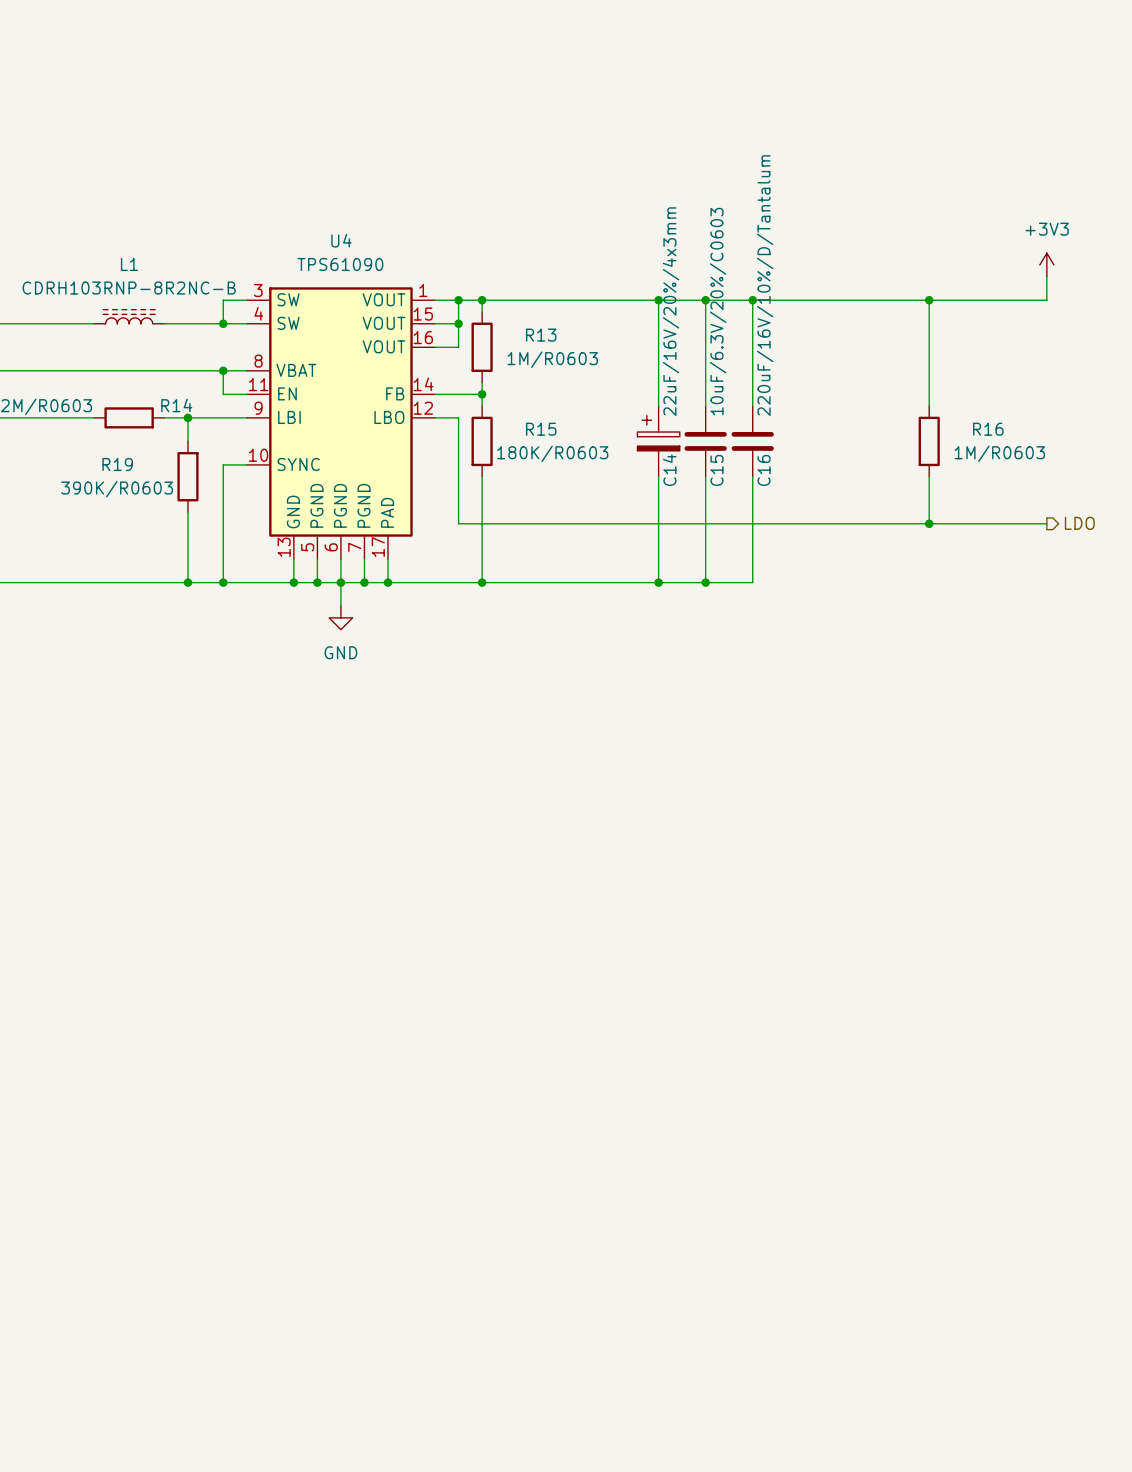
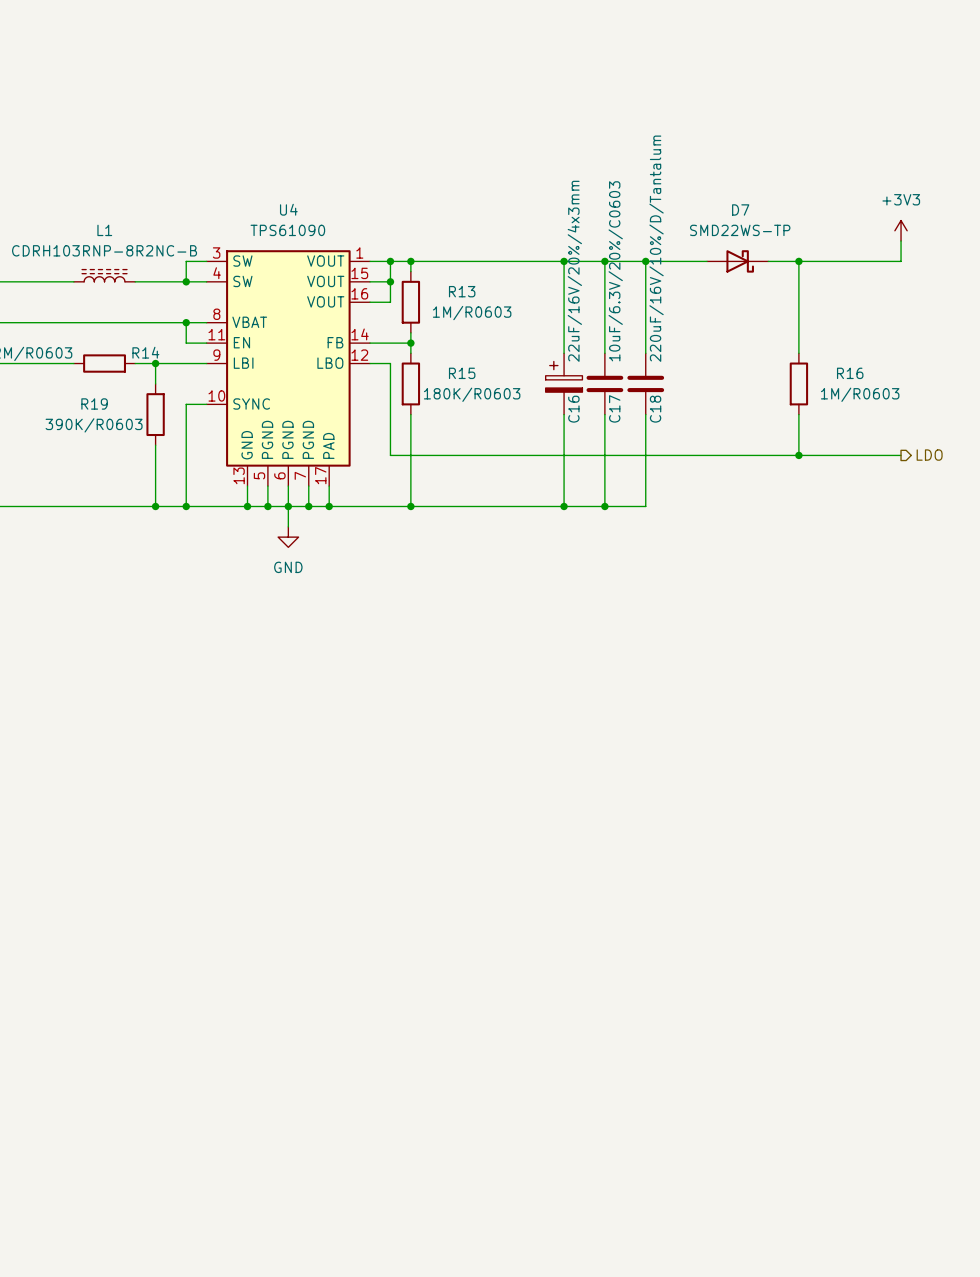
D7: none -> SMD22WS-TP (737, 261)
C14 name: C14 (669, 470) -> C16 (573, 409)
C15 name: C15 (716, 470) -> C17 (614, 408)
C16 name: C16 (764, 470) -> C18 (655, 409)

